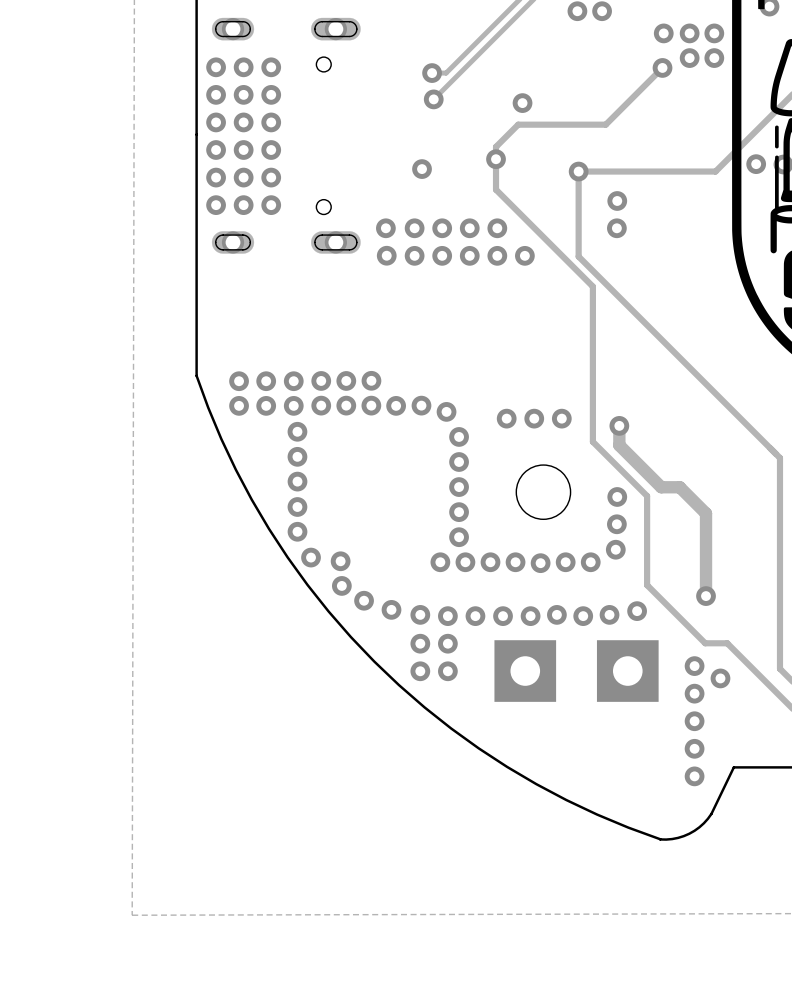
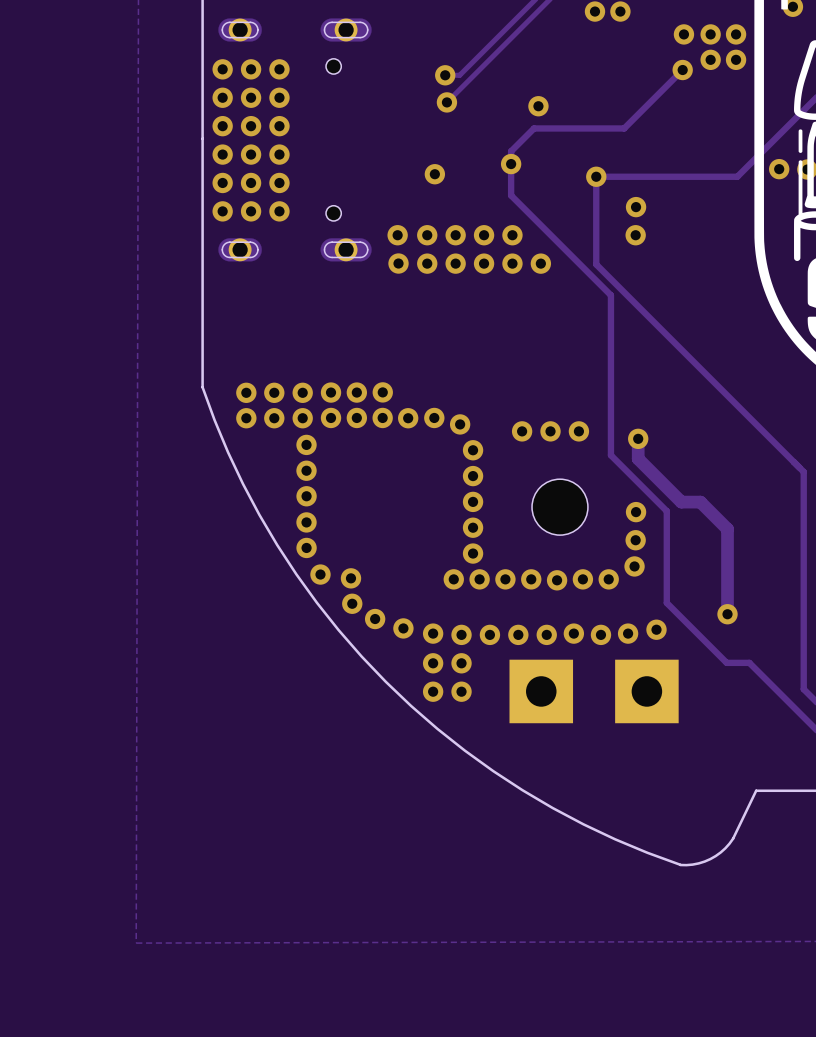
via: (694, 666) -> none
via: (720, 678) -> none
via: (694, 693) -> none
via: (694, 721) -> none
via: (694, 748) -> none
via: (694, 776) -> none

